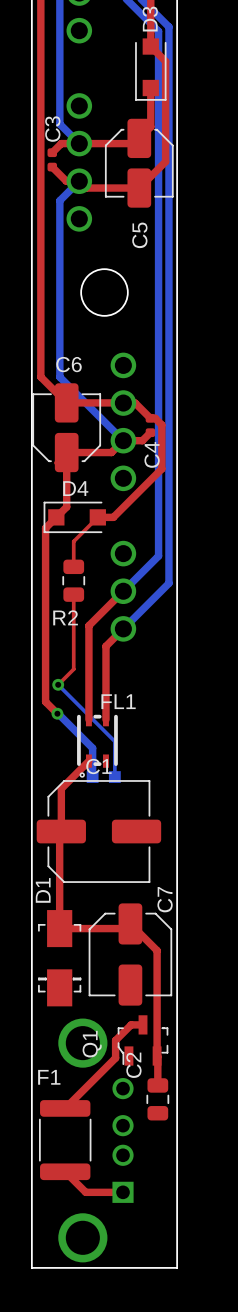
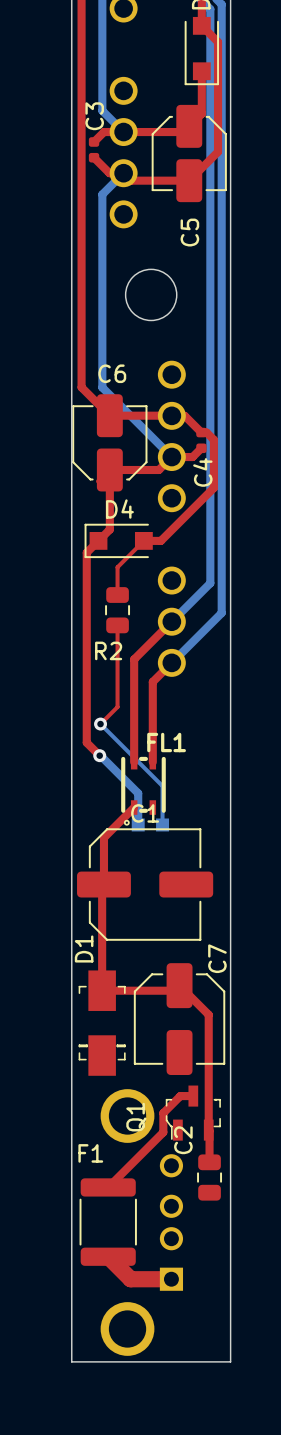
top track width: thin (65, 1171) (85, 1192) (123, 1192) -> thick (108, 1256) (130, 1279) (171, 1279)

